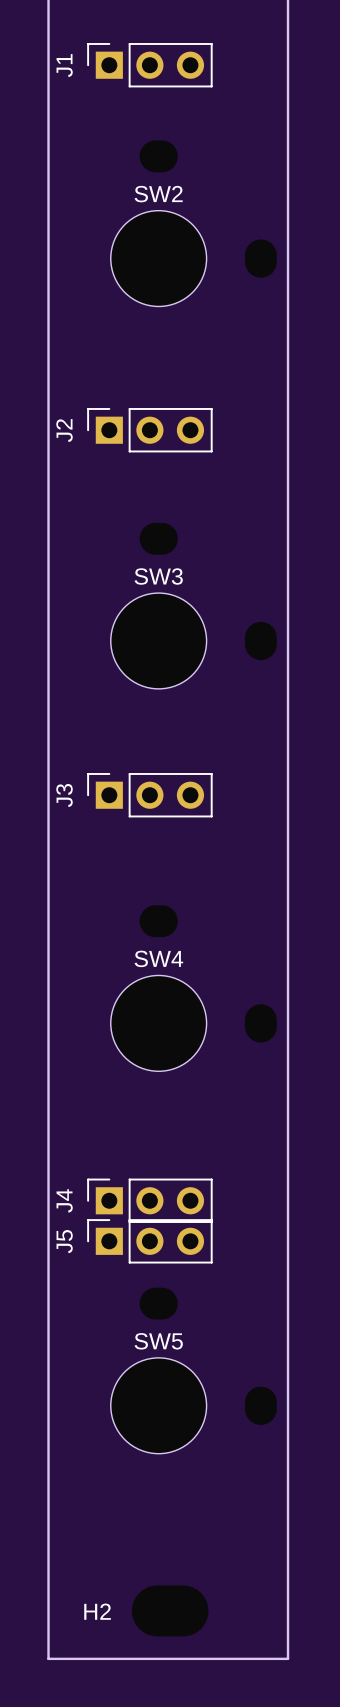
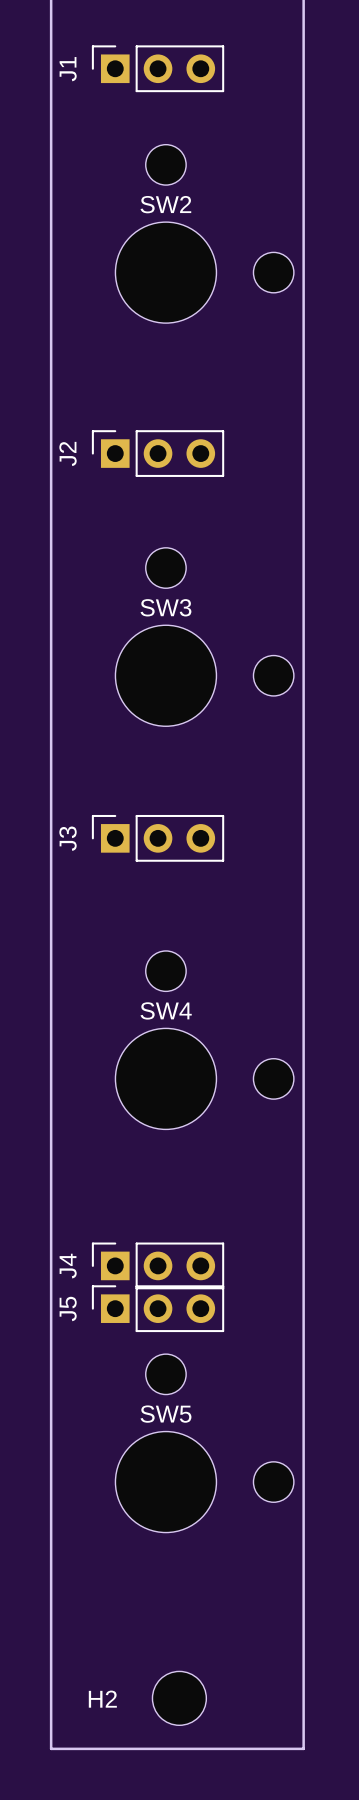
SW2 footprint: [110, 140, 277, 307] -> [115, 144, 294, 324]
SW3 footprint: [110, 522, 277, 689] -> [115, 547, 294, 727]
SW4 footprint: [110, 905, 277, 1072] -> [115, 950, 294, 1130]
SW5 footprint: [110, 1287, 277, 1454] -> [115, 1354, 294, 1533]
H2 footprint: [131, 1585, 209, 1637] -> [152, 1671, 207, 1726]

